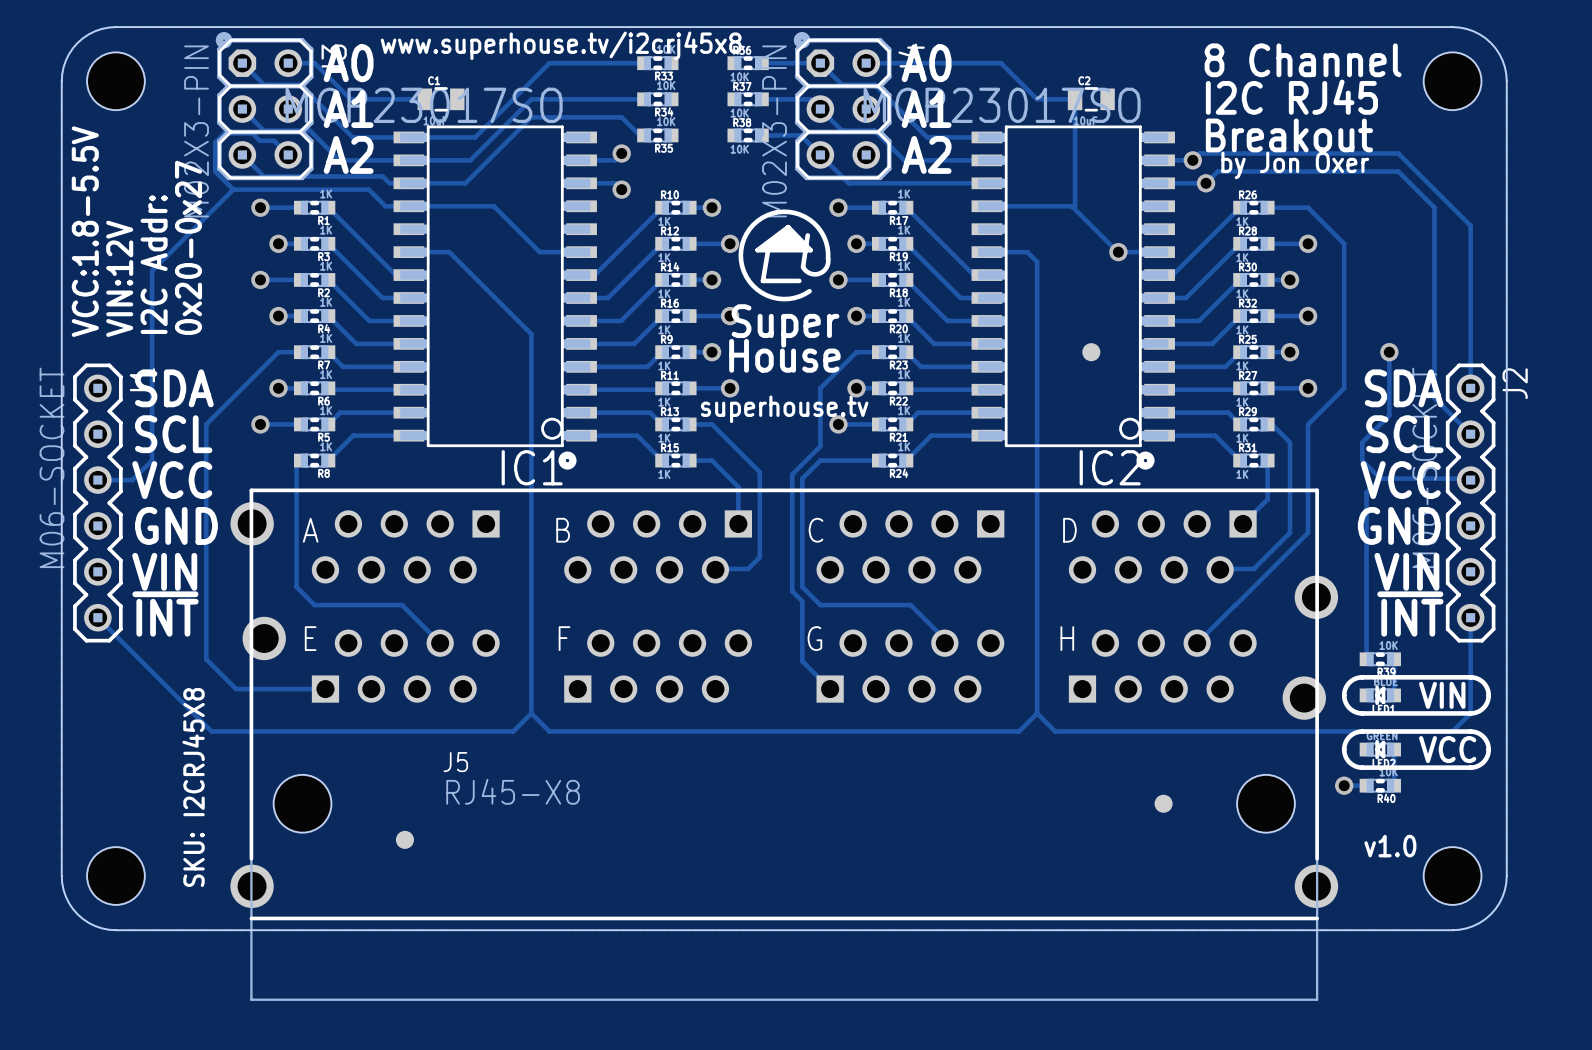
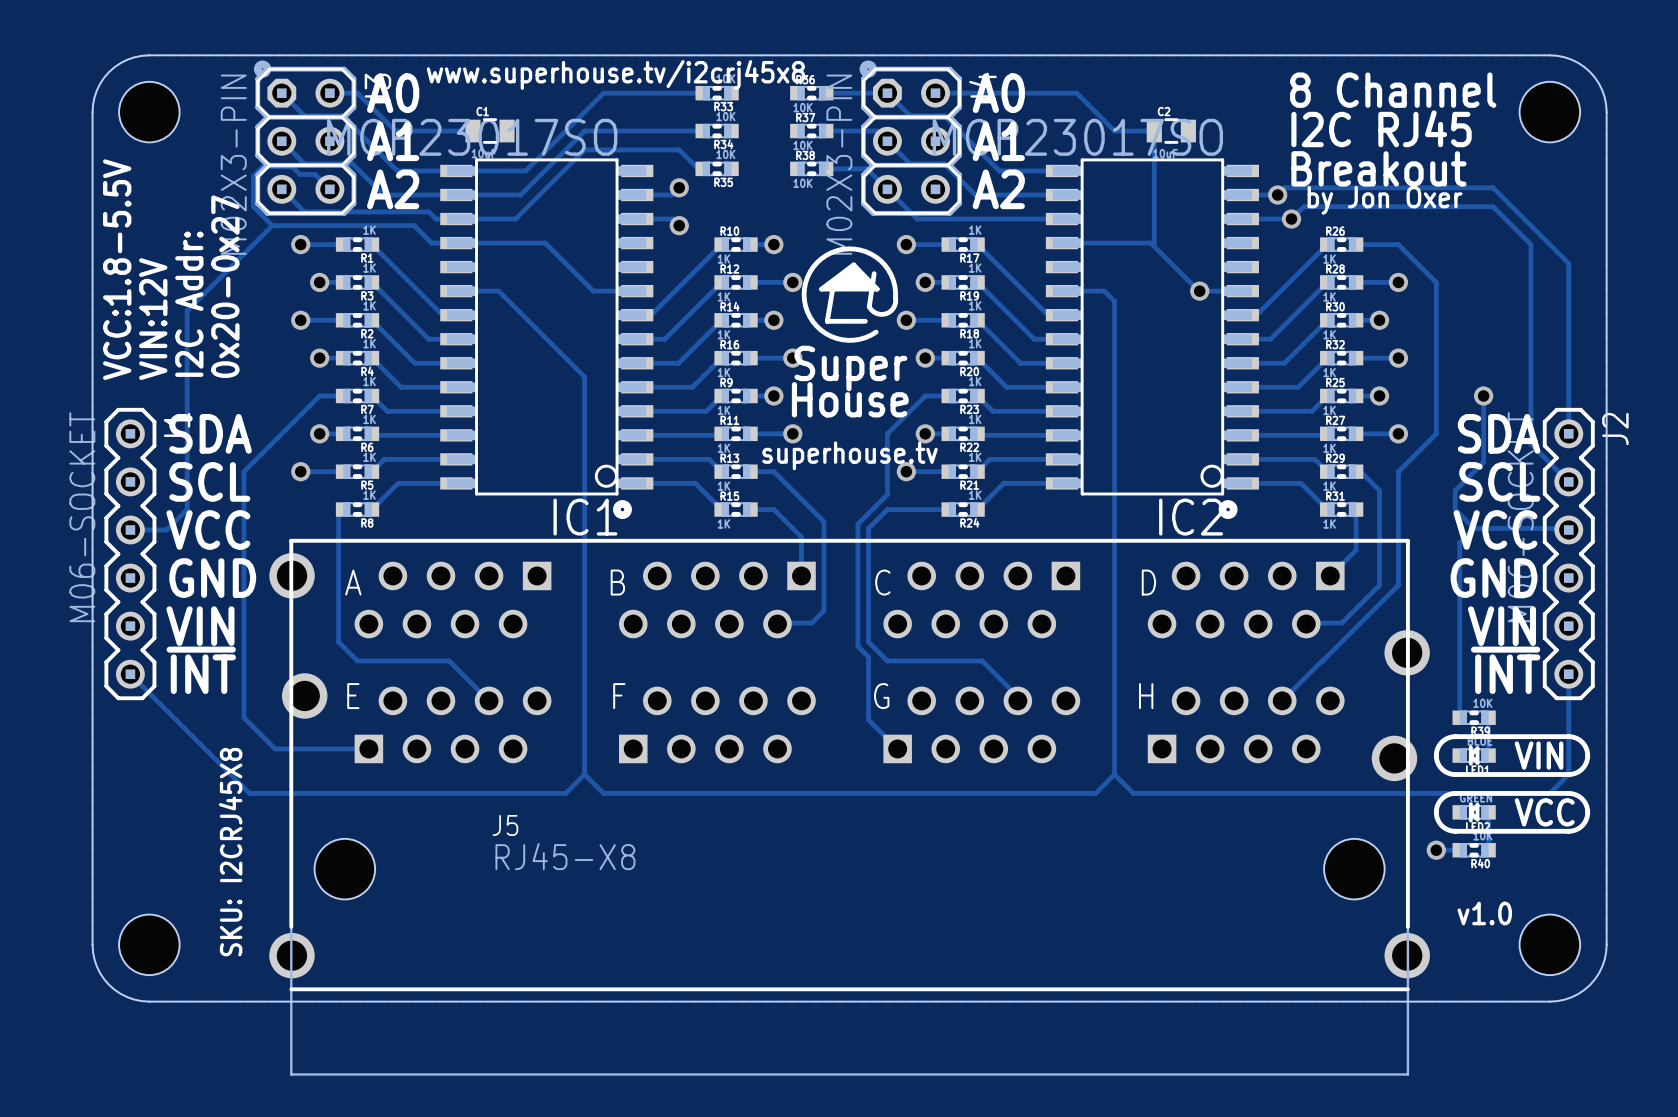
part: (1091, 352) -> none
part: (1163, 803) -> none
part: (404, 839) -> none

